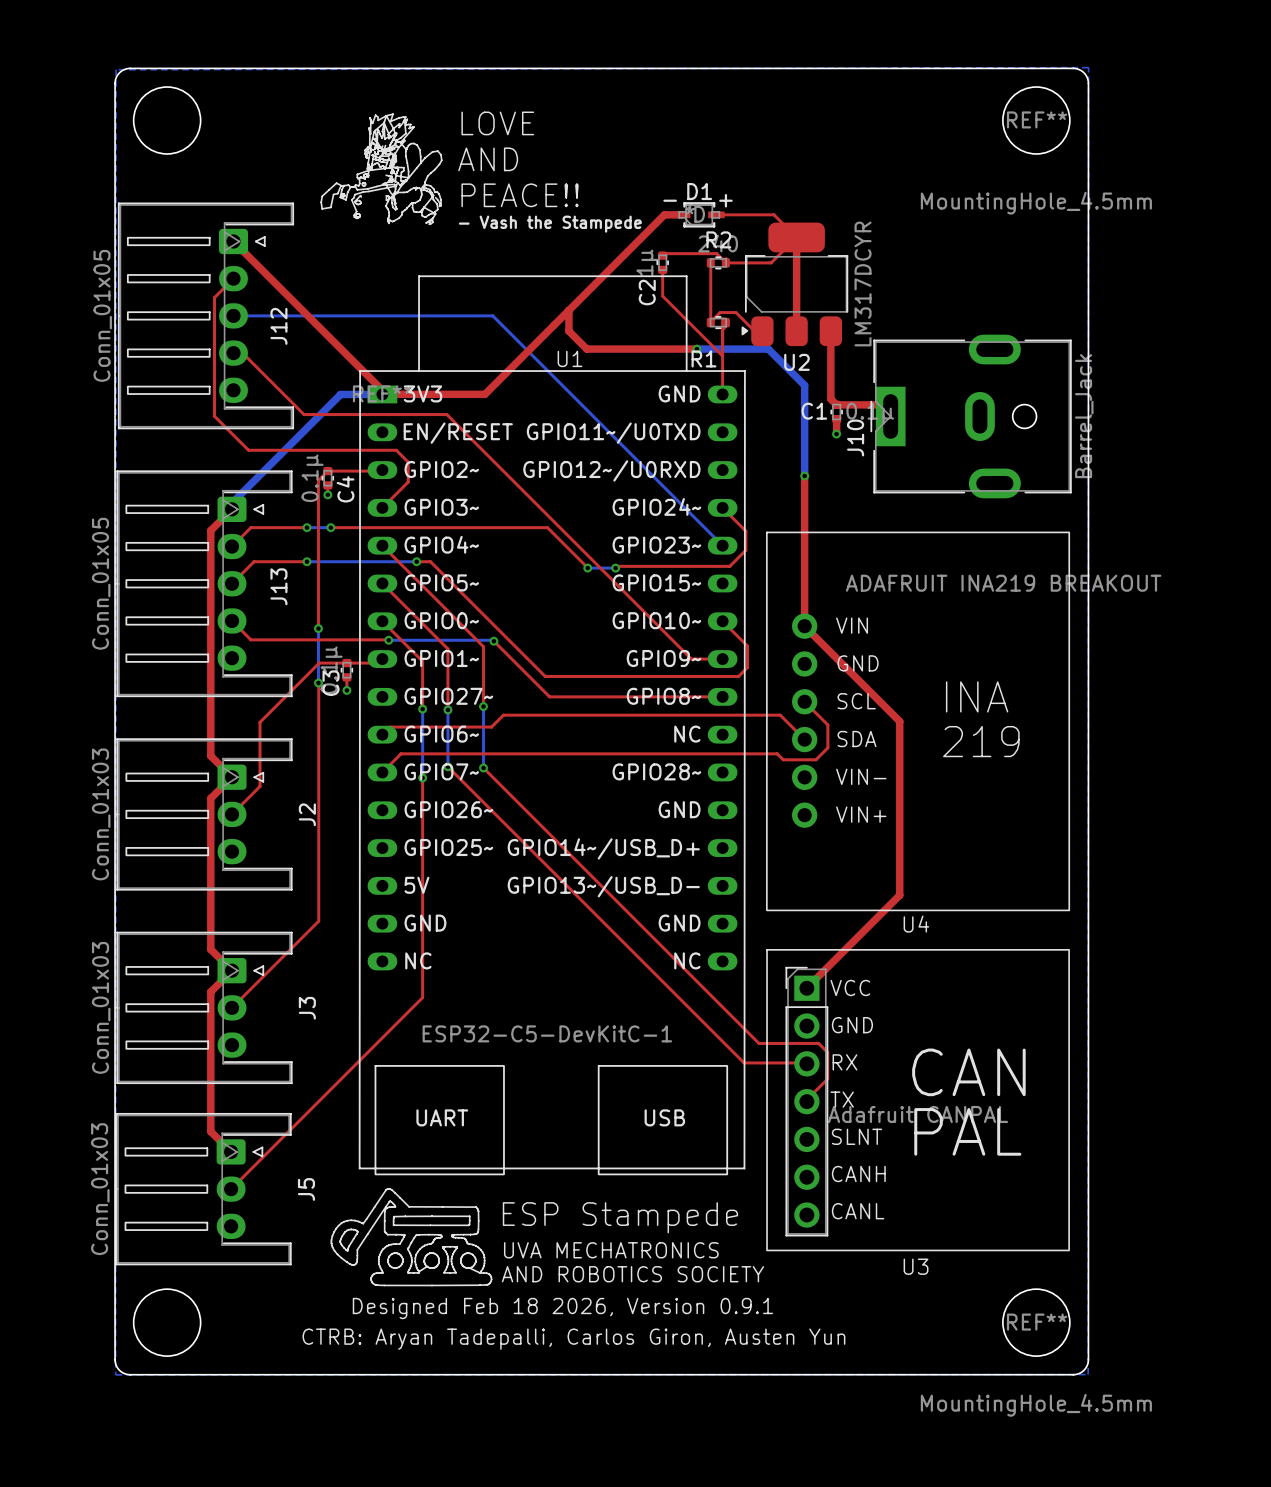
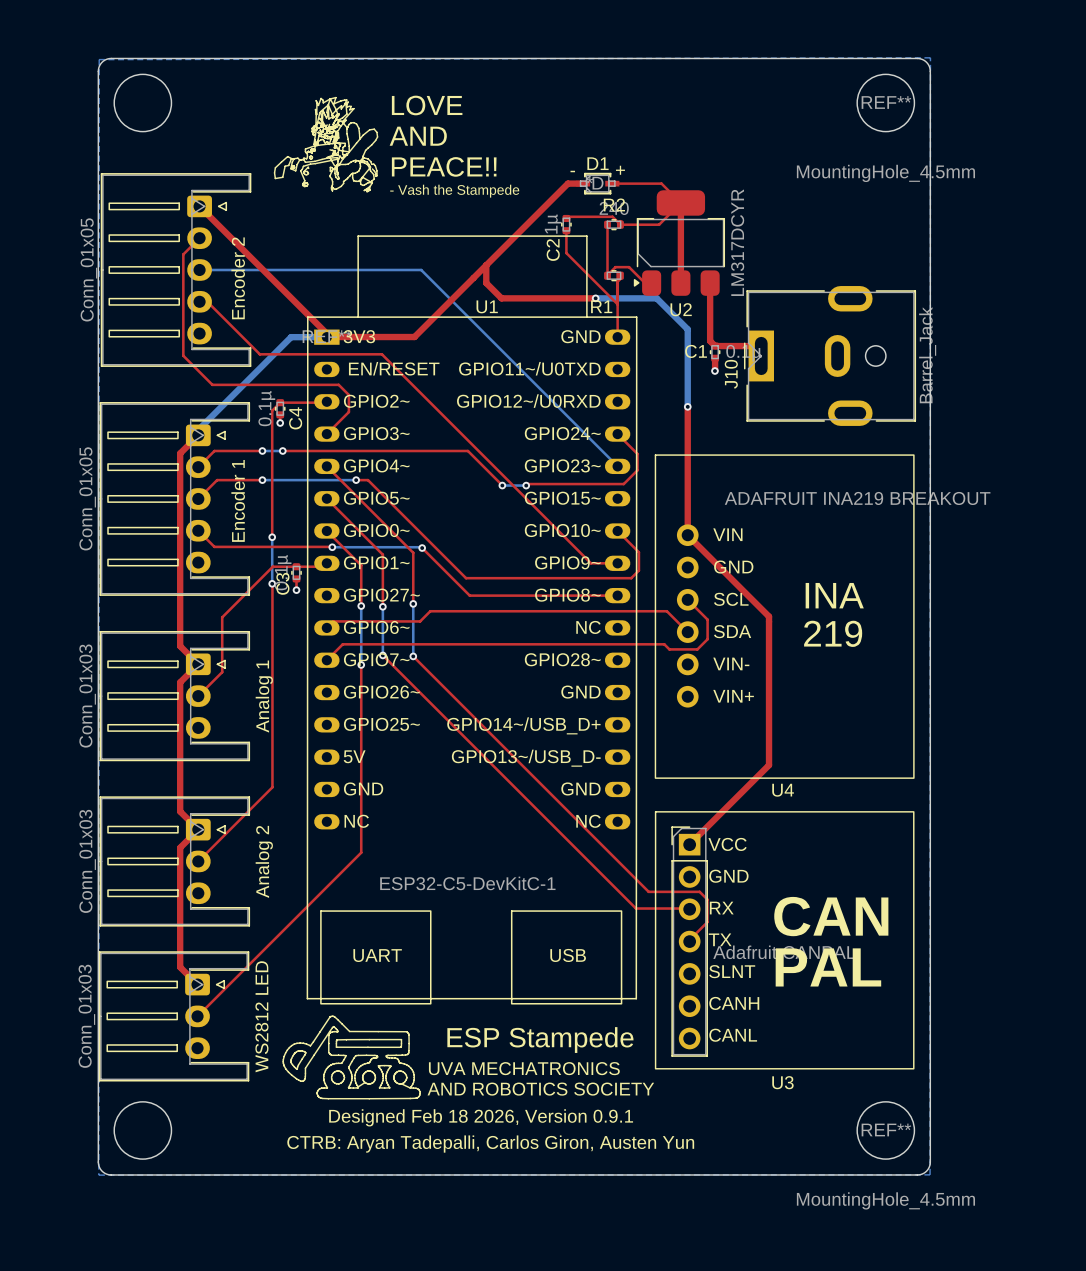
J12 name: J12 (278, 326) -> Encoder 2 (238, 278)
J13 name: J13 (278, 586) -> Encoder 1 (238, 500)
J2 name: J2 (307, 814) -> Analog 1 (264, 696)
J3 name: J3 (307, 1008) -> Analog 2 (264, 861)
J5 name: J5 (306, 1189) -> WS2812 LED (261, 1016)

